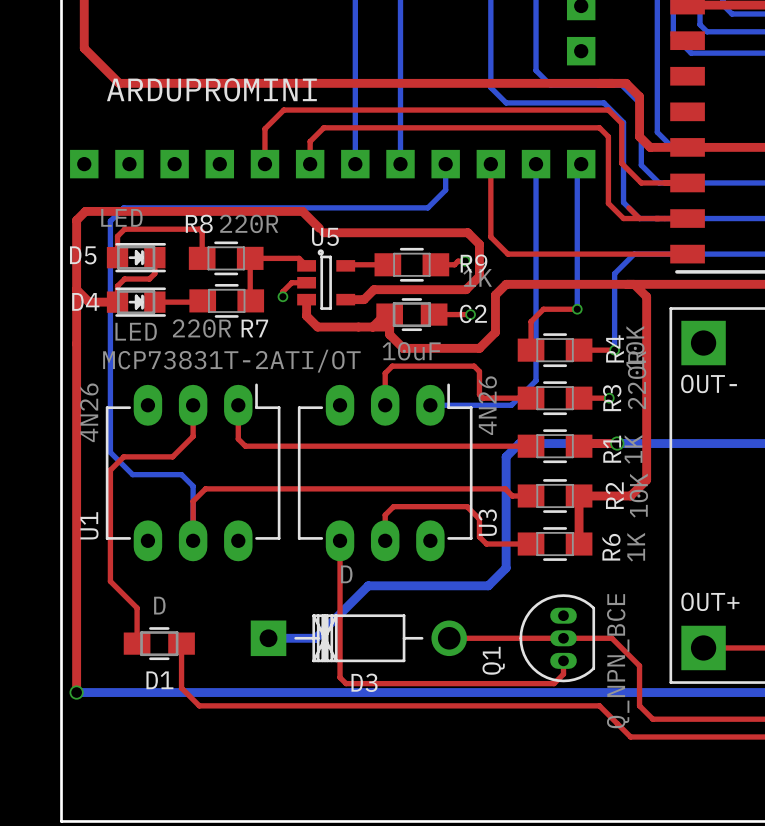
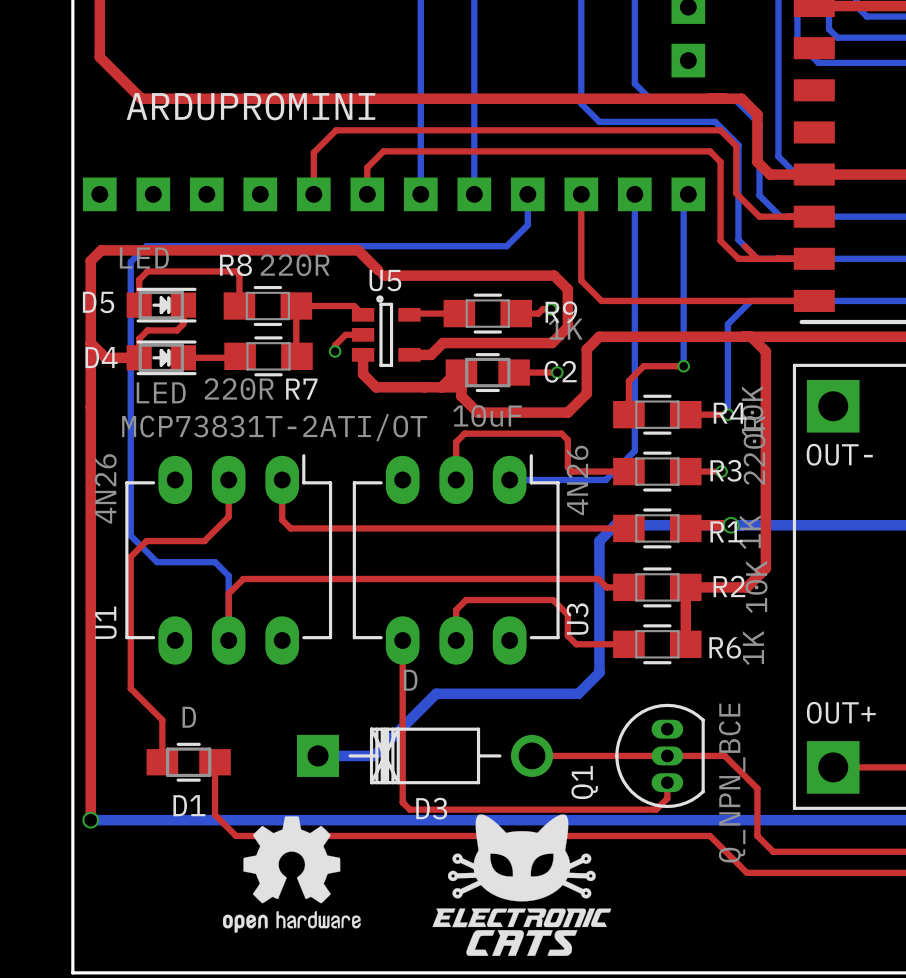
R4 name rotation: 0° (615, 348) -> 90° clockwise (729, 413)
R3 name rotation: 0° (612, 398) -> 90° clockwise (725, 470)
R1 name rotation: 0° (612, 449) -> 90° clockwise (726, 531)
R2 name rotation: 0° (614, 495) -> 90° clockwise (729, 586)
R6 name rotation: 0° (611, 547) -> 90° clockwise (725, 647)
drawing: none -> [432, 814, 612, 956]
drawing: none -> [222, 816, 361, 933]

